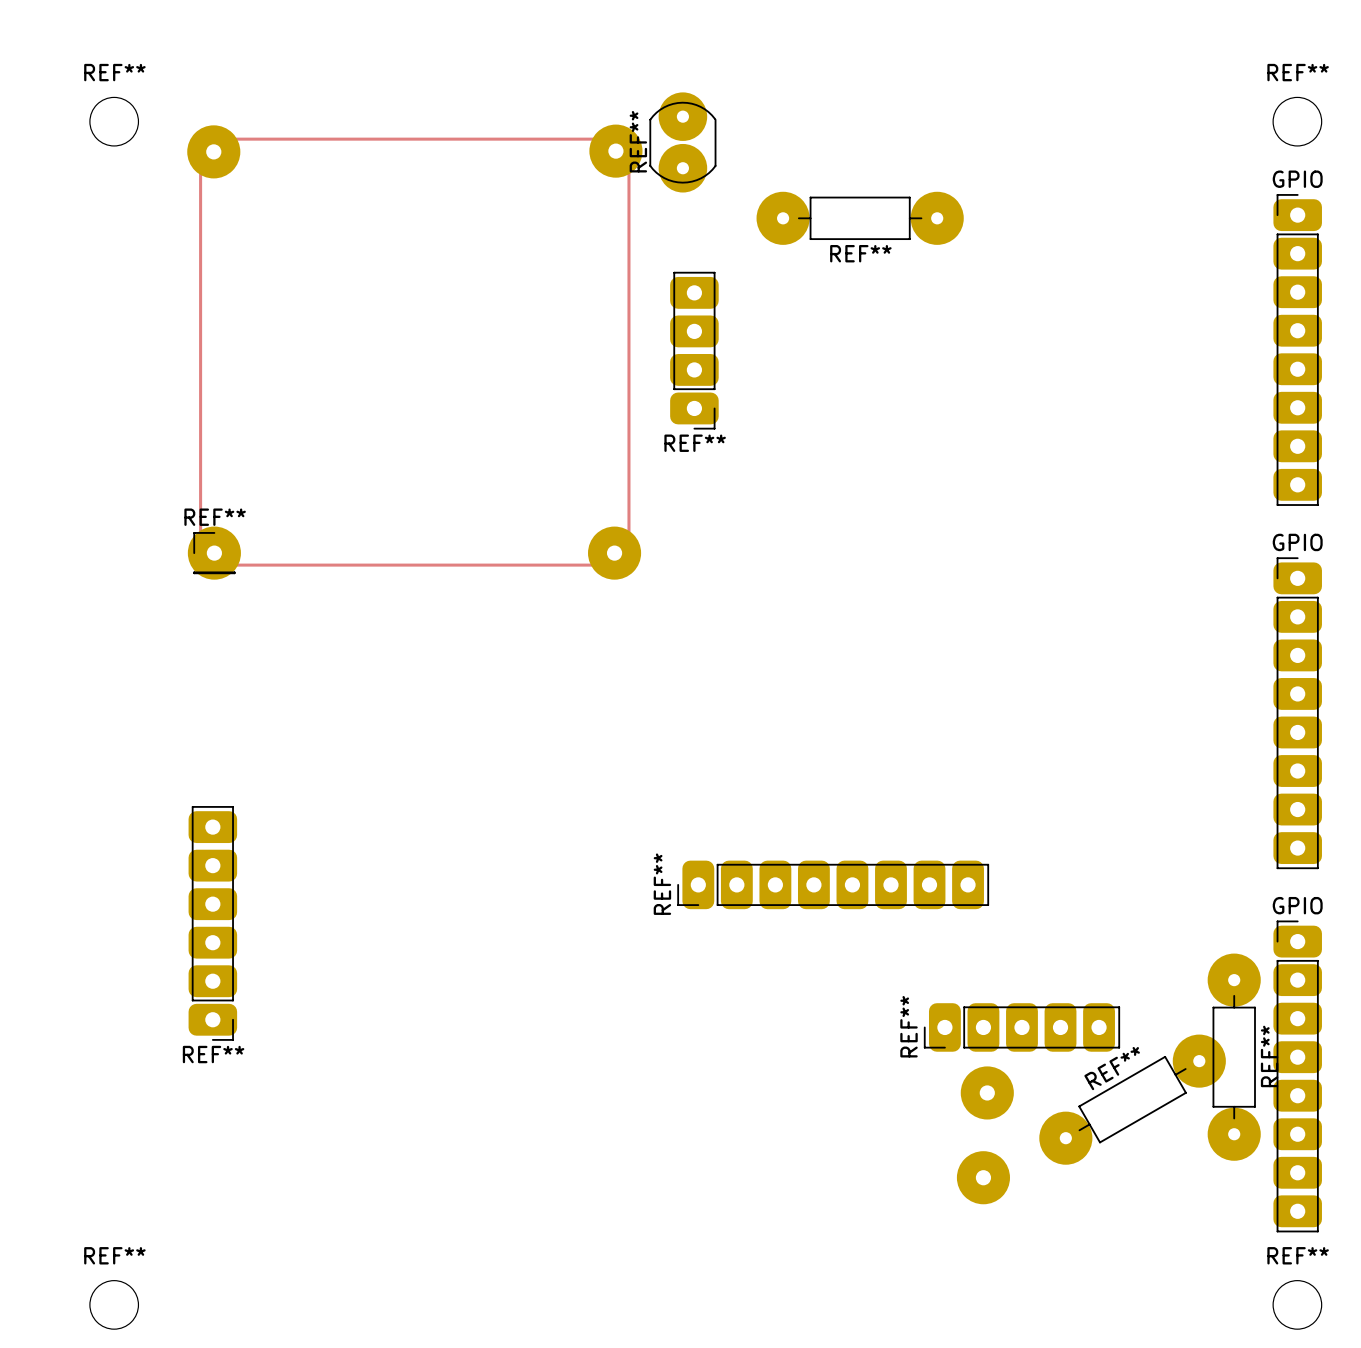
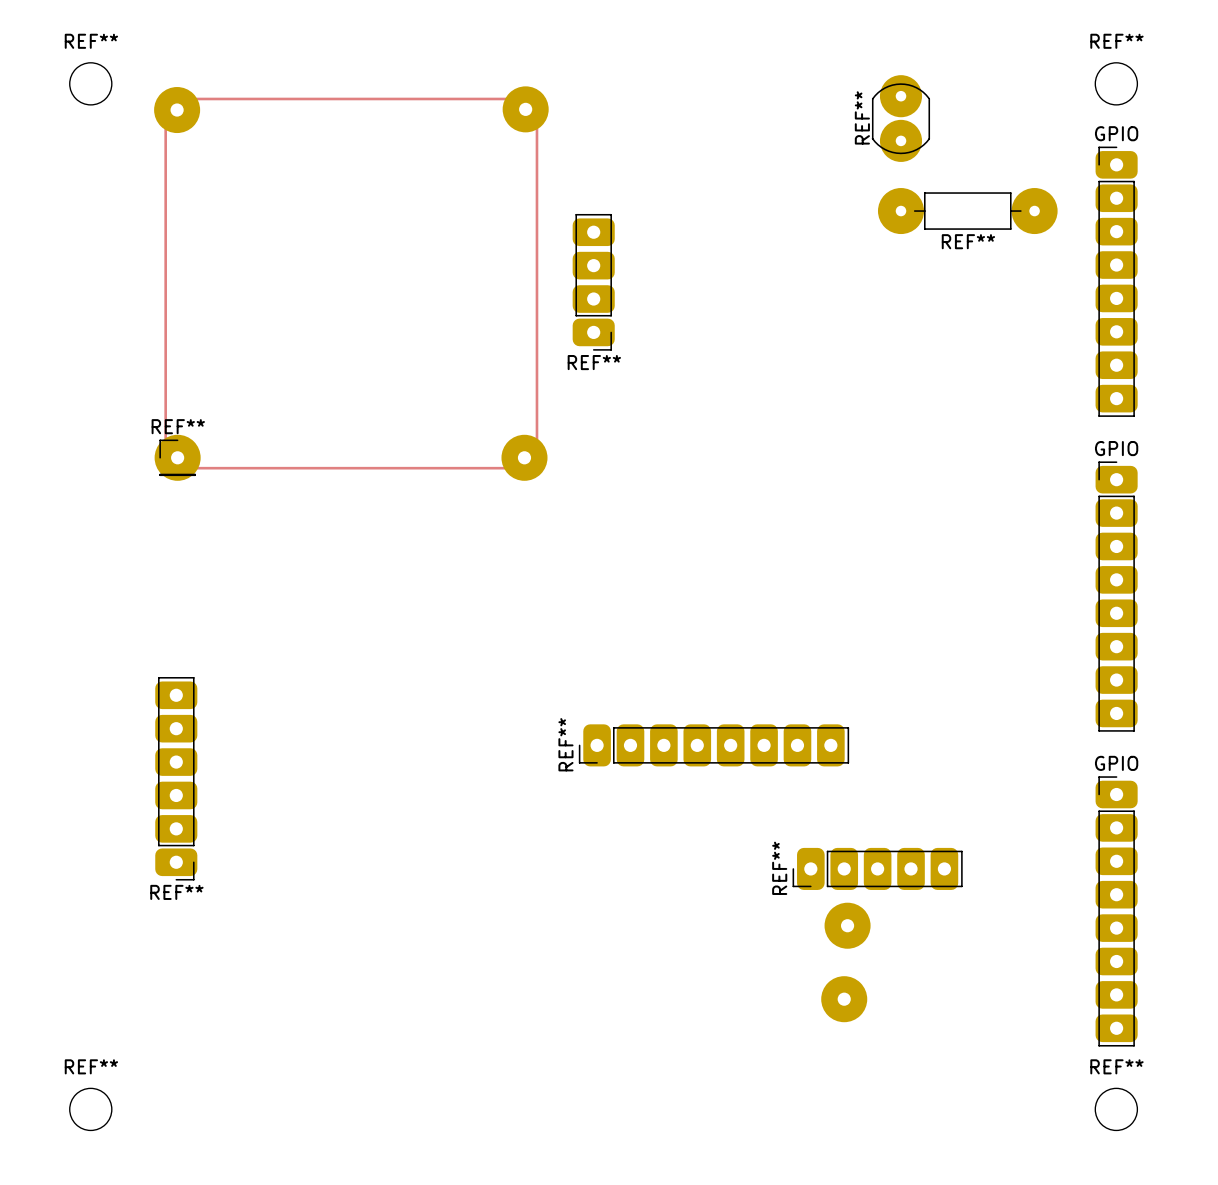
REF** position: (682, 142) -> (900, 118)
REF** position: (860, 218) -> (967, 211)
REF**: (1234, 1057) -> none
REF**: (1132, 1099) -> none

